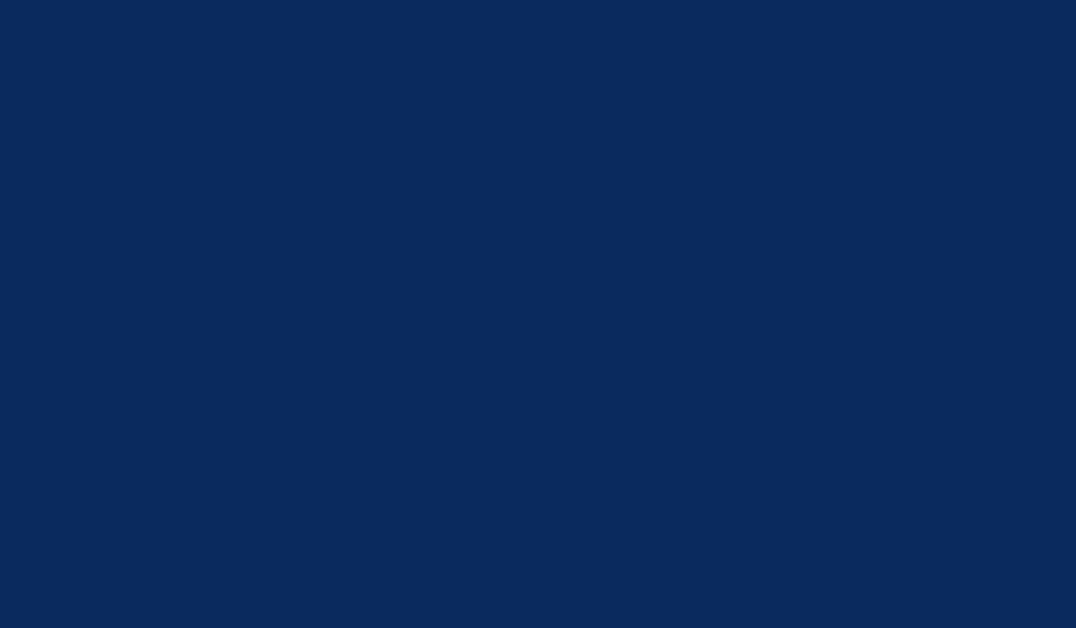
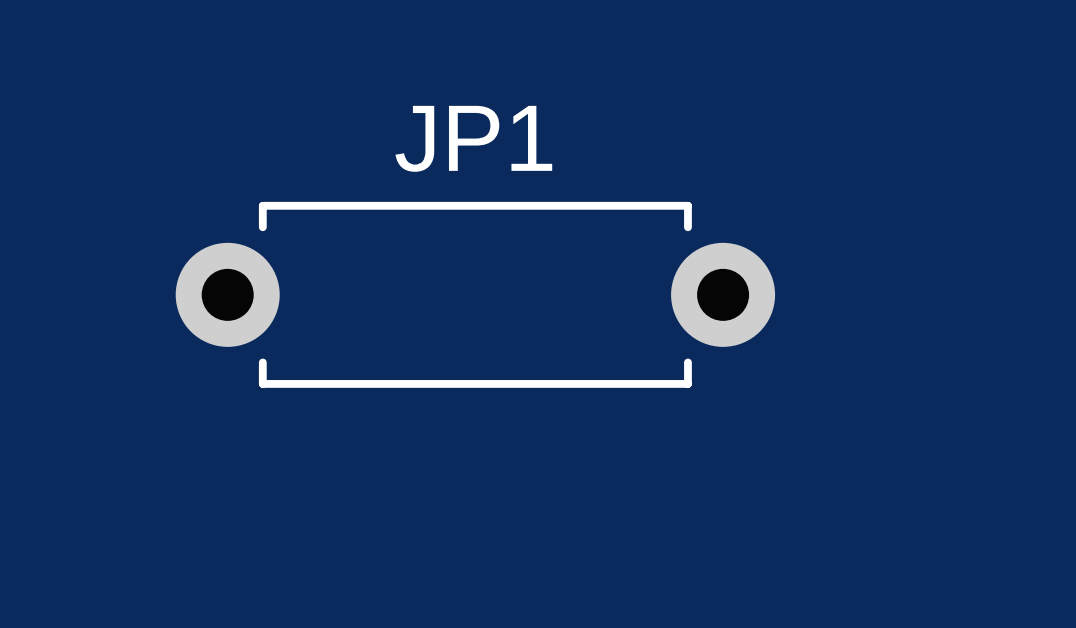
JP1: none -> (475, 294)

